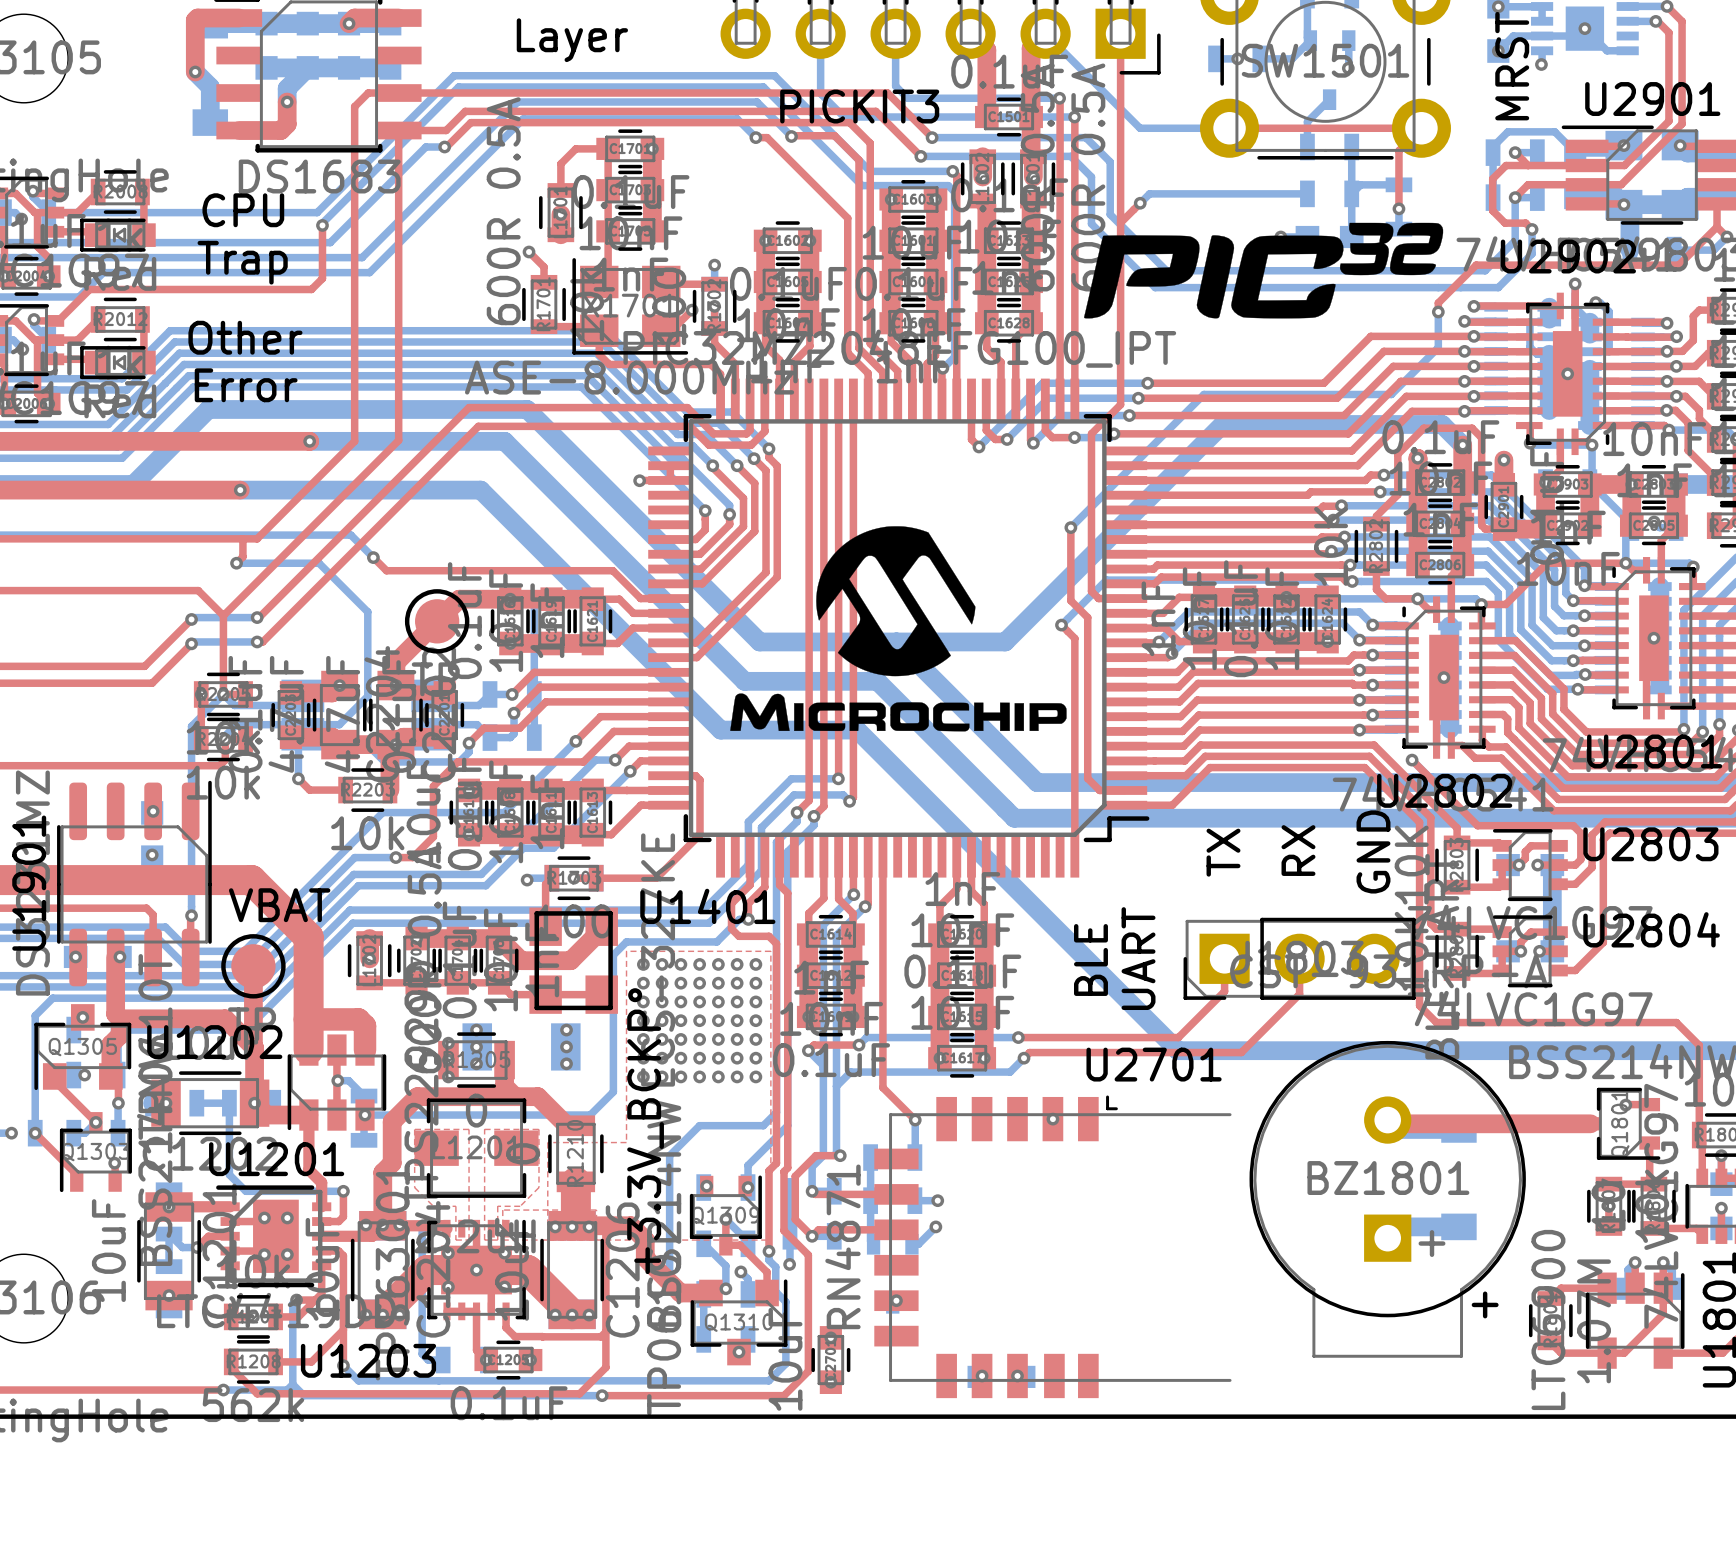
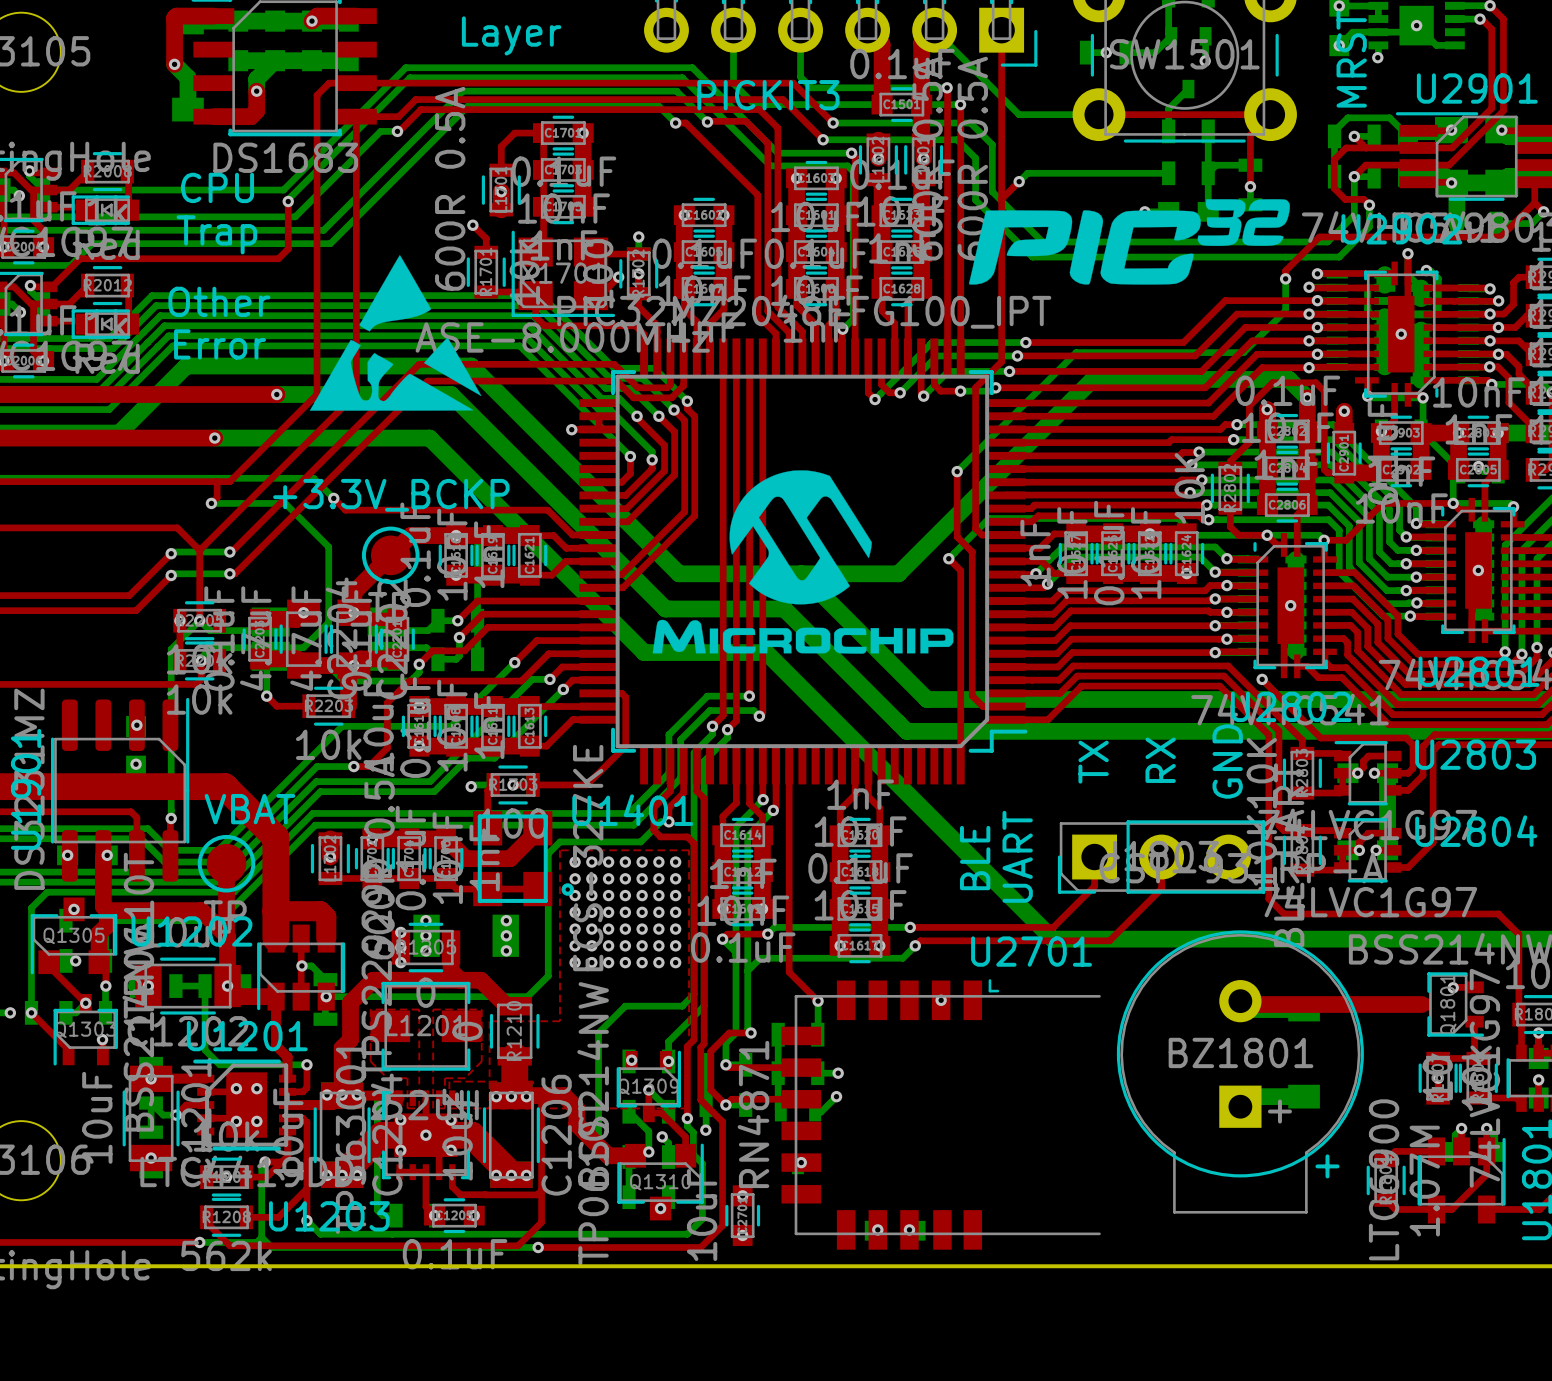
drawing: none -> [309, 255, 482, 411]
text rotation: 0° (645, 1141) -> 90° clockwise (391, 495)
text position: +3.3V_BCKP (645, 1141) -> +3.3V_BCKP (391, 495)

